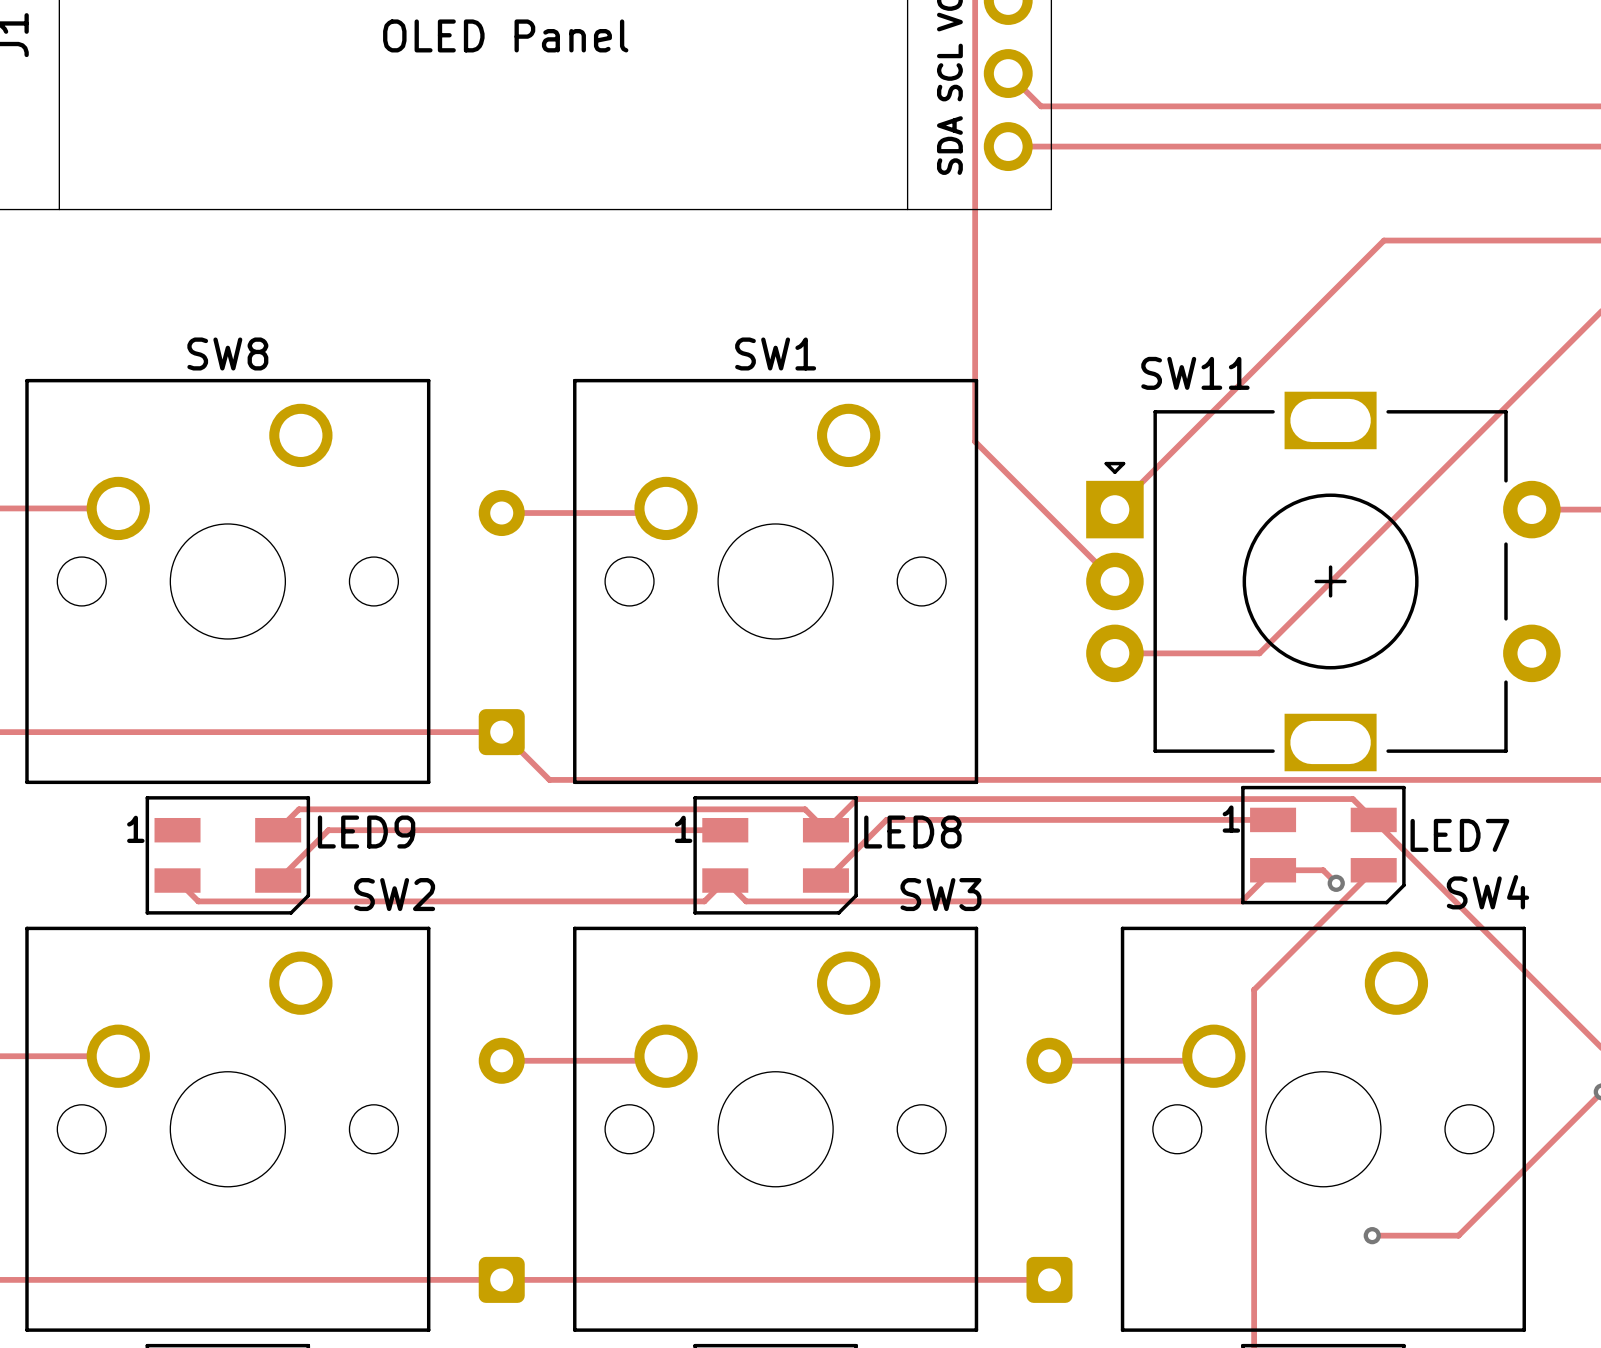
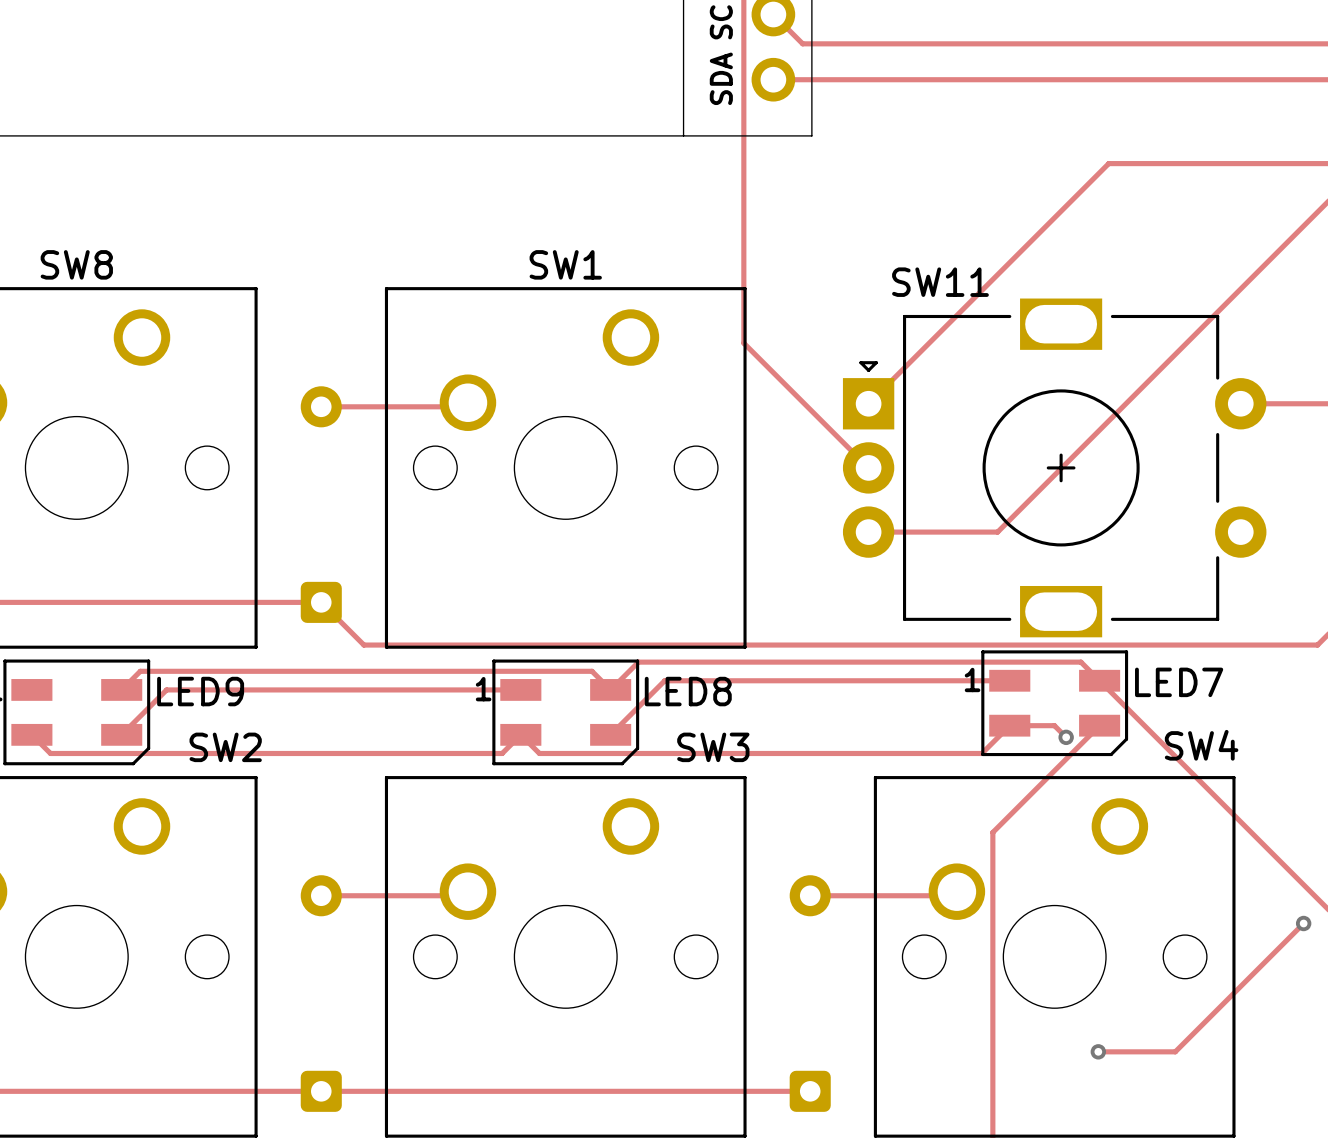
LED7 name position: LED7 (1459, 835) -> LED7 (1179, 682)

